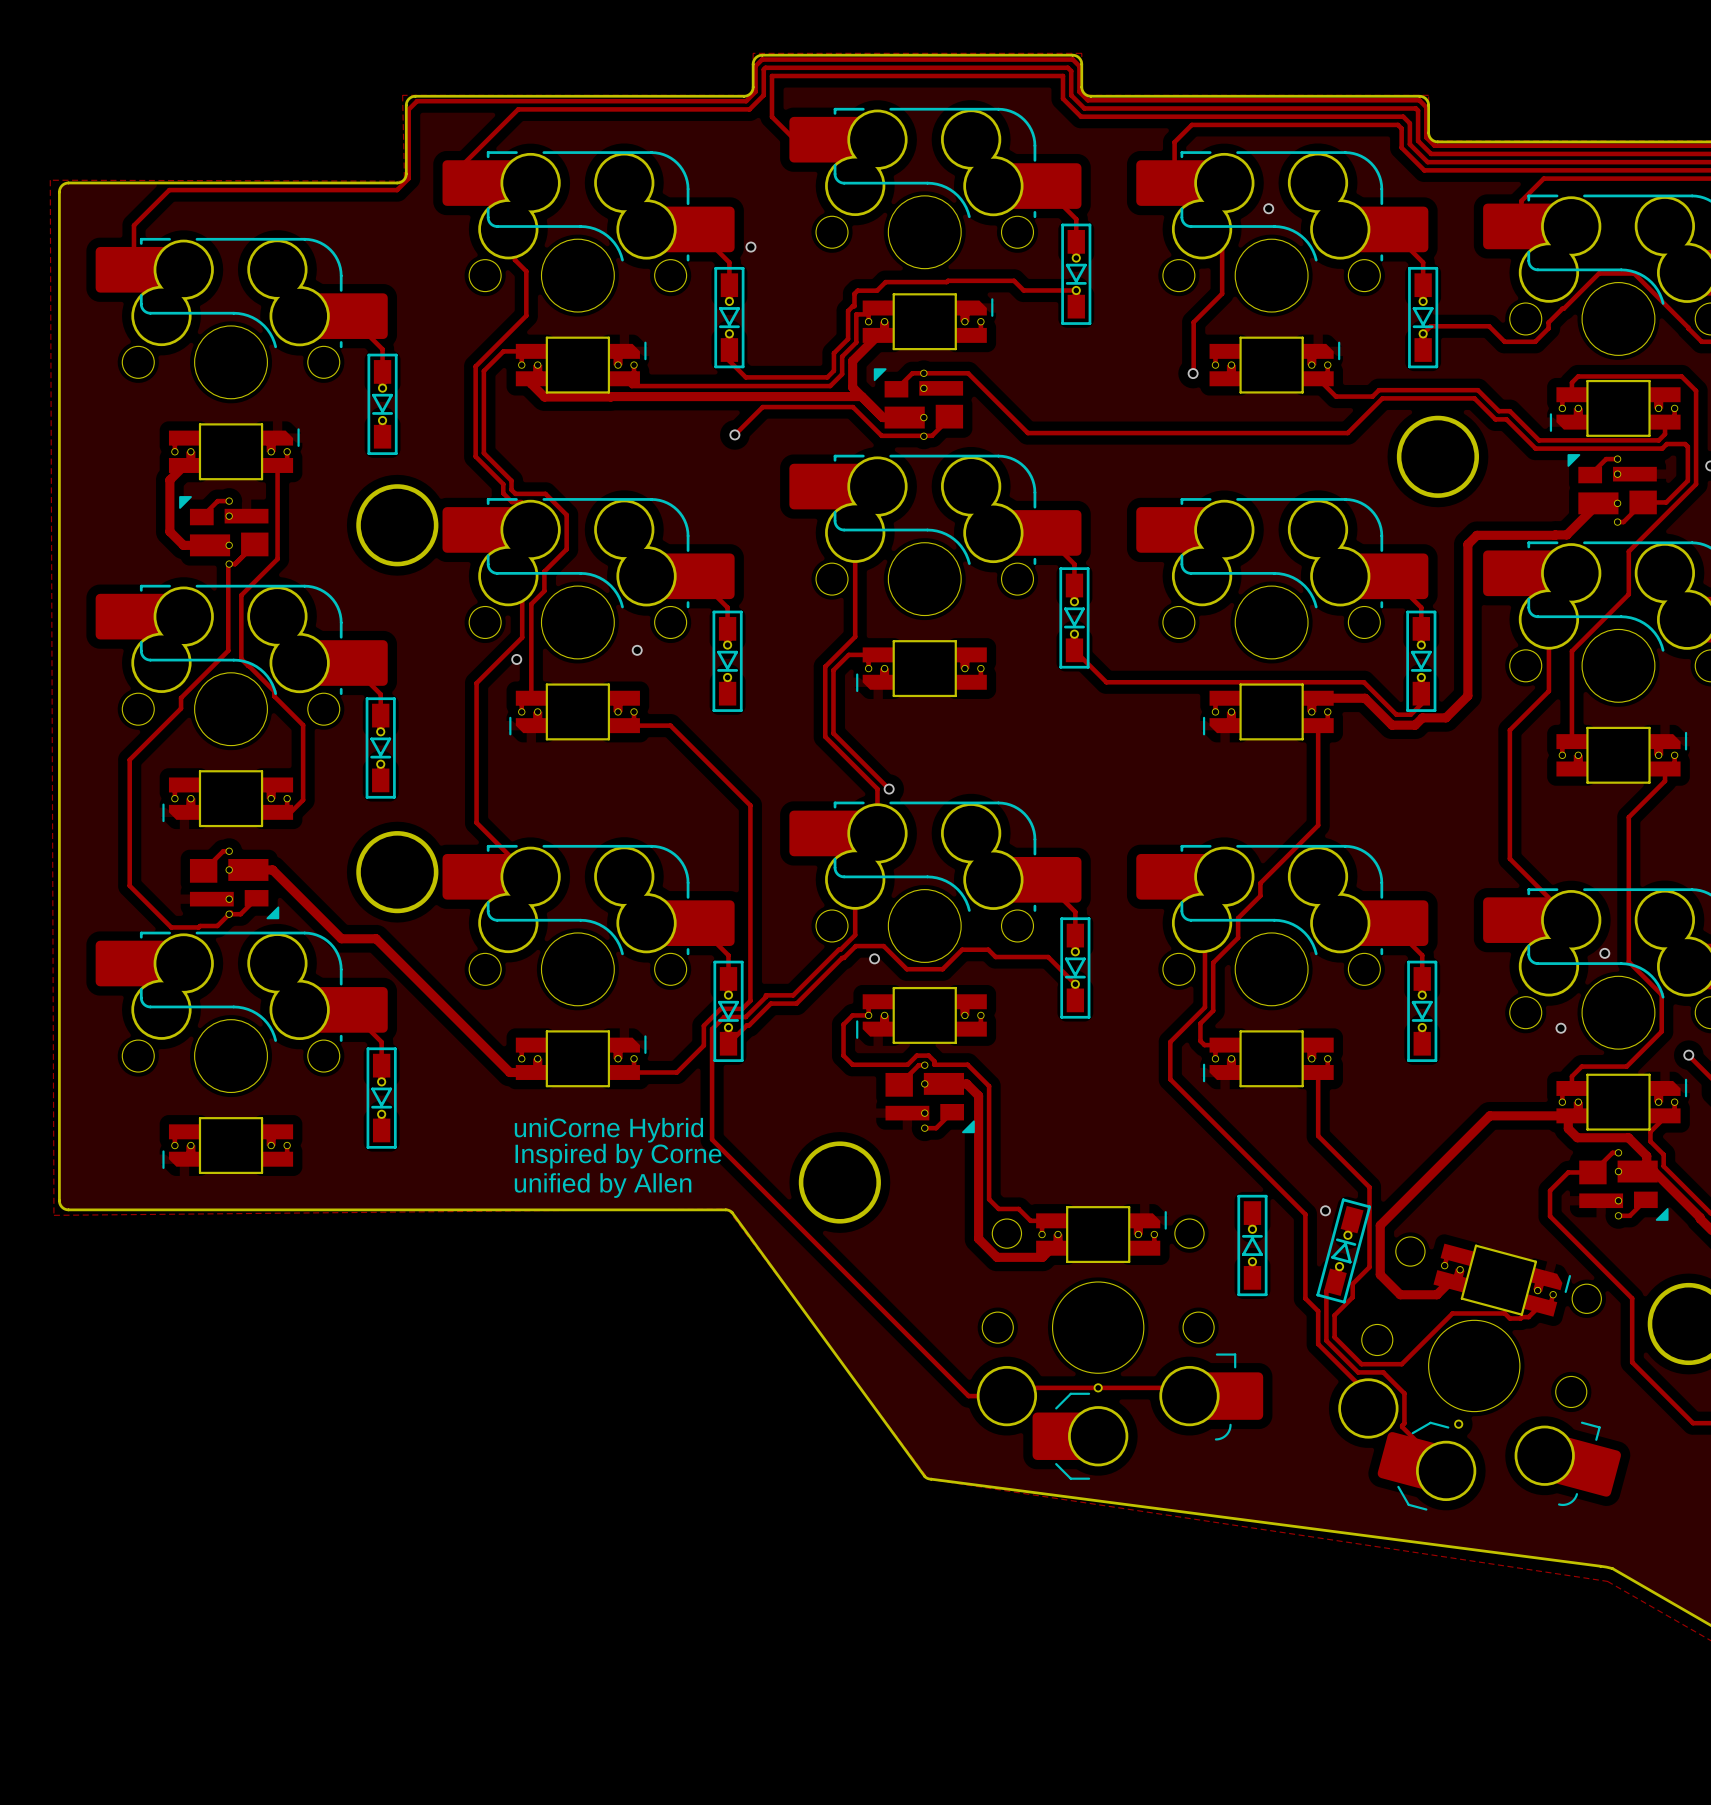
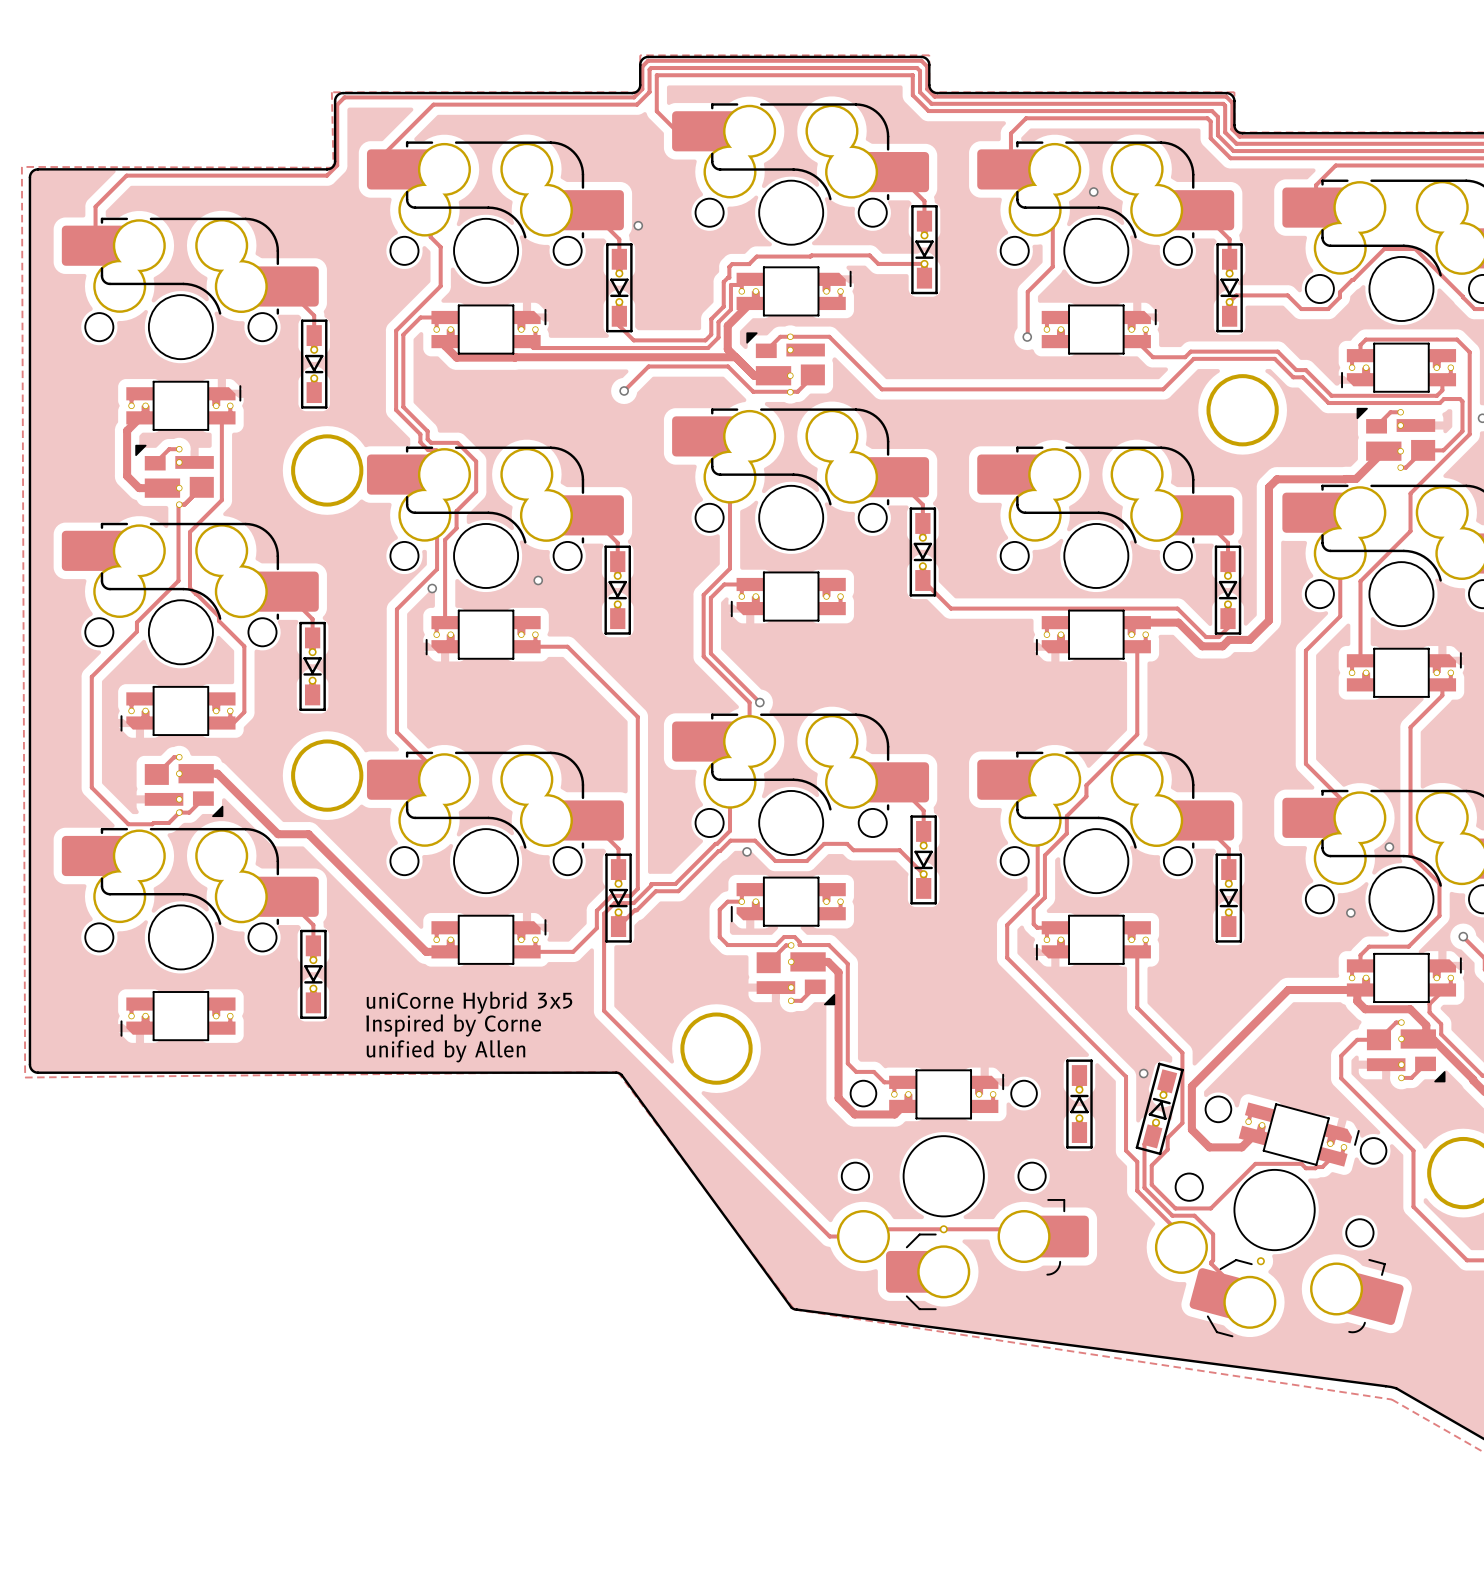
text: uniCorne Hybrid (608, 1130) -> uniCorne Hybrid 3x5 (469, 1002)
text position: Inspired by Corne (618, 1156) -> Inspired by Corne (453, 1025)
text position: unified by Allen (603, 1185) -> unified by Allen (445, 1051)

